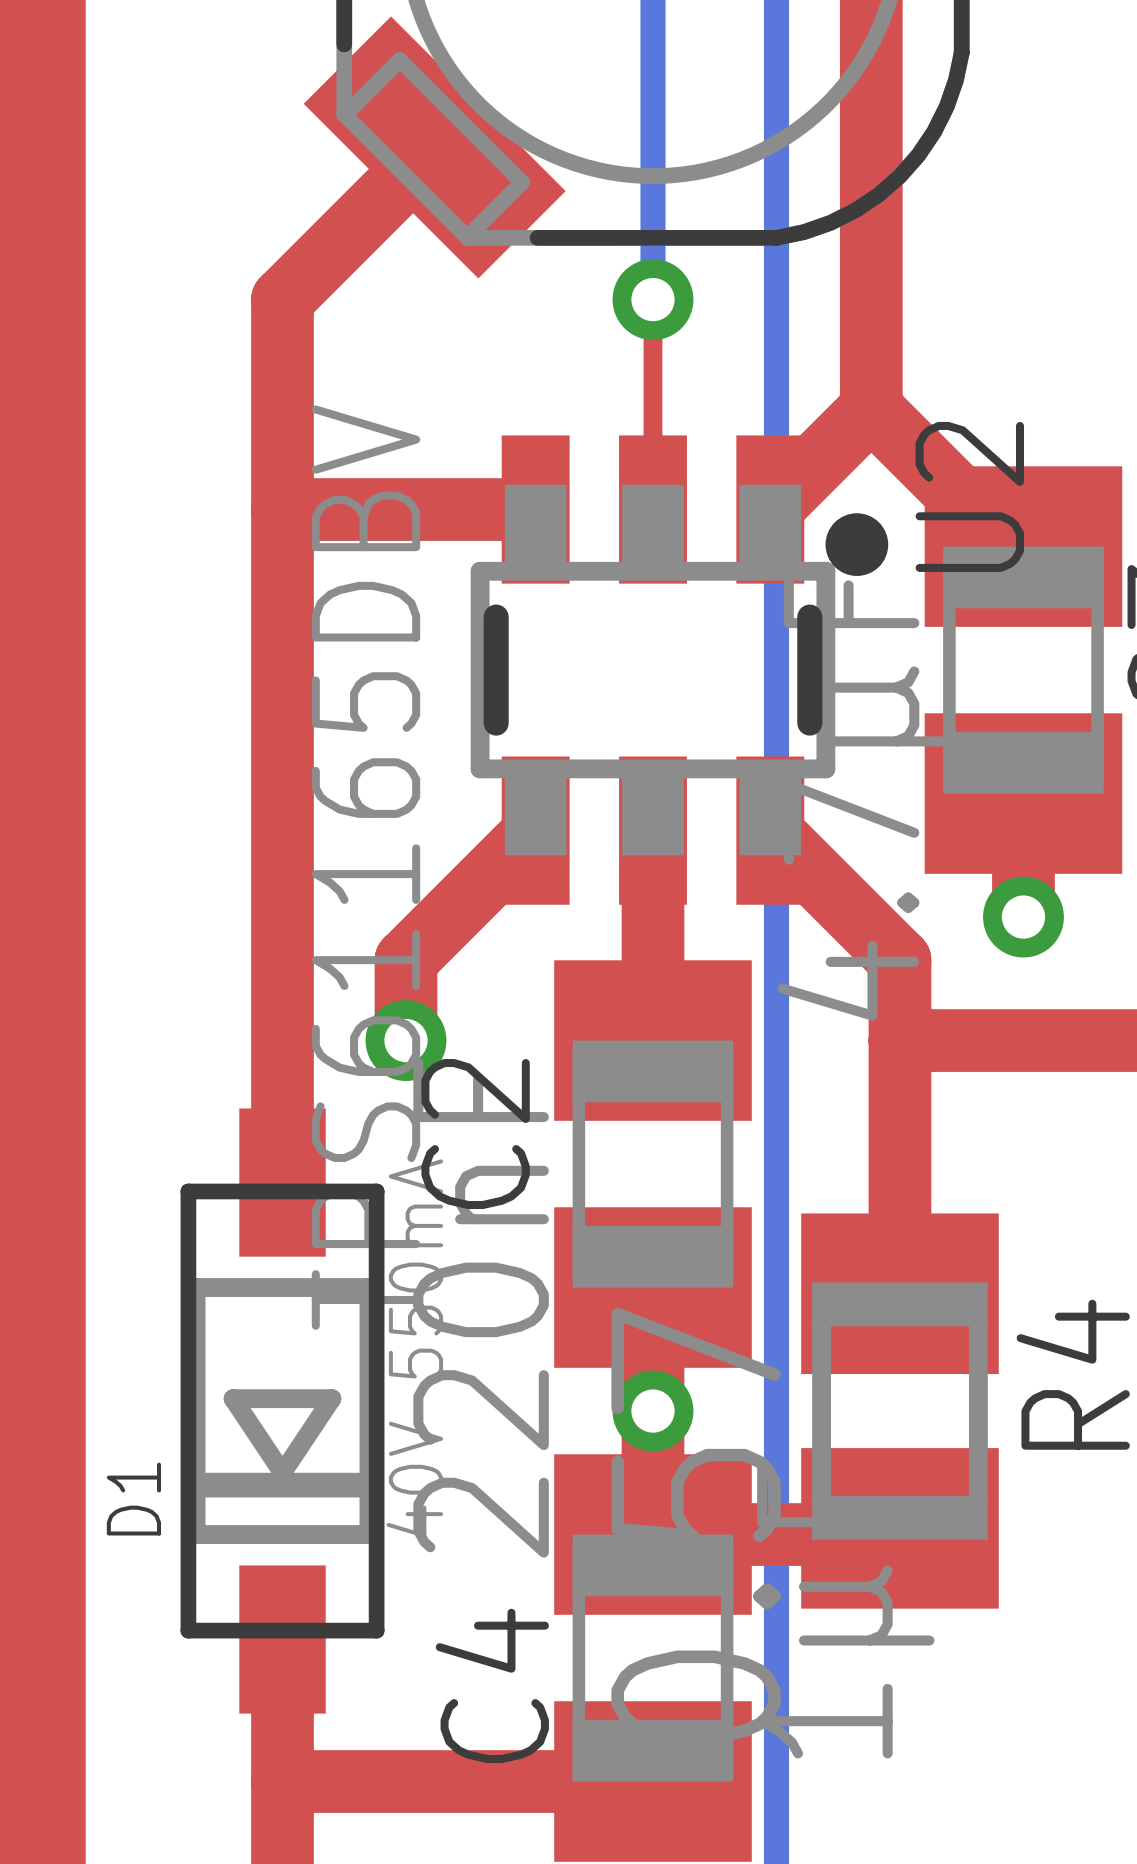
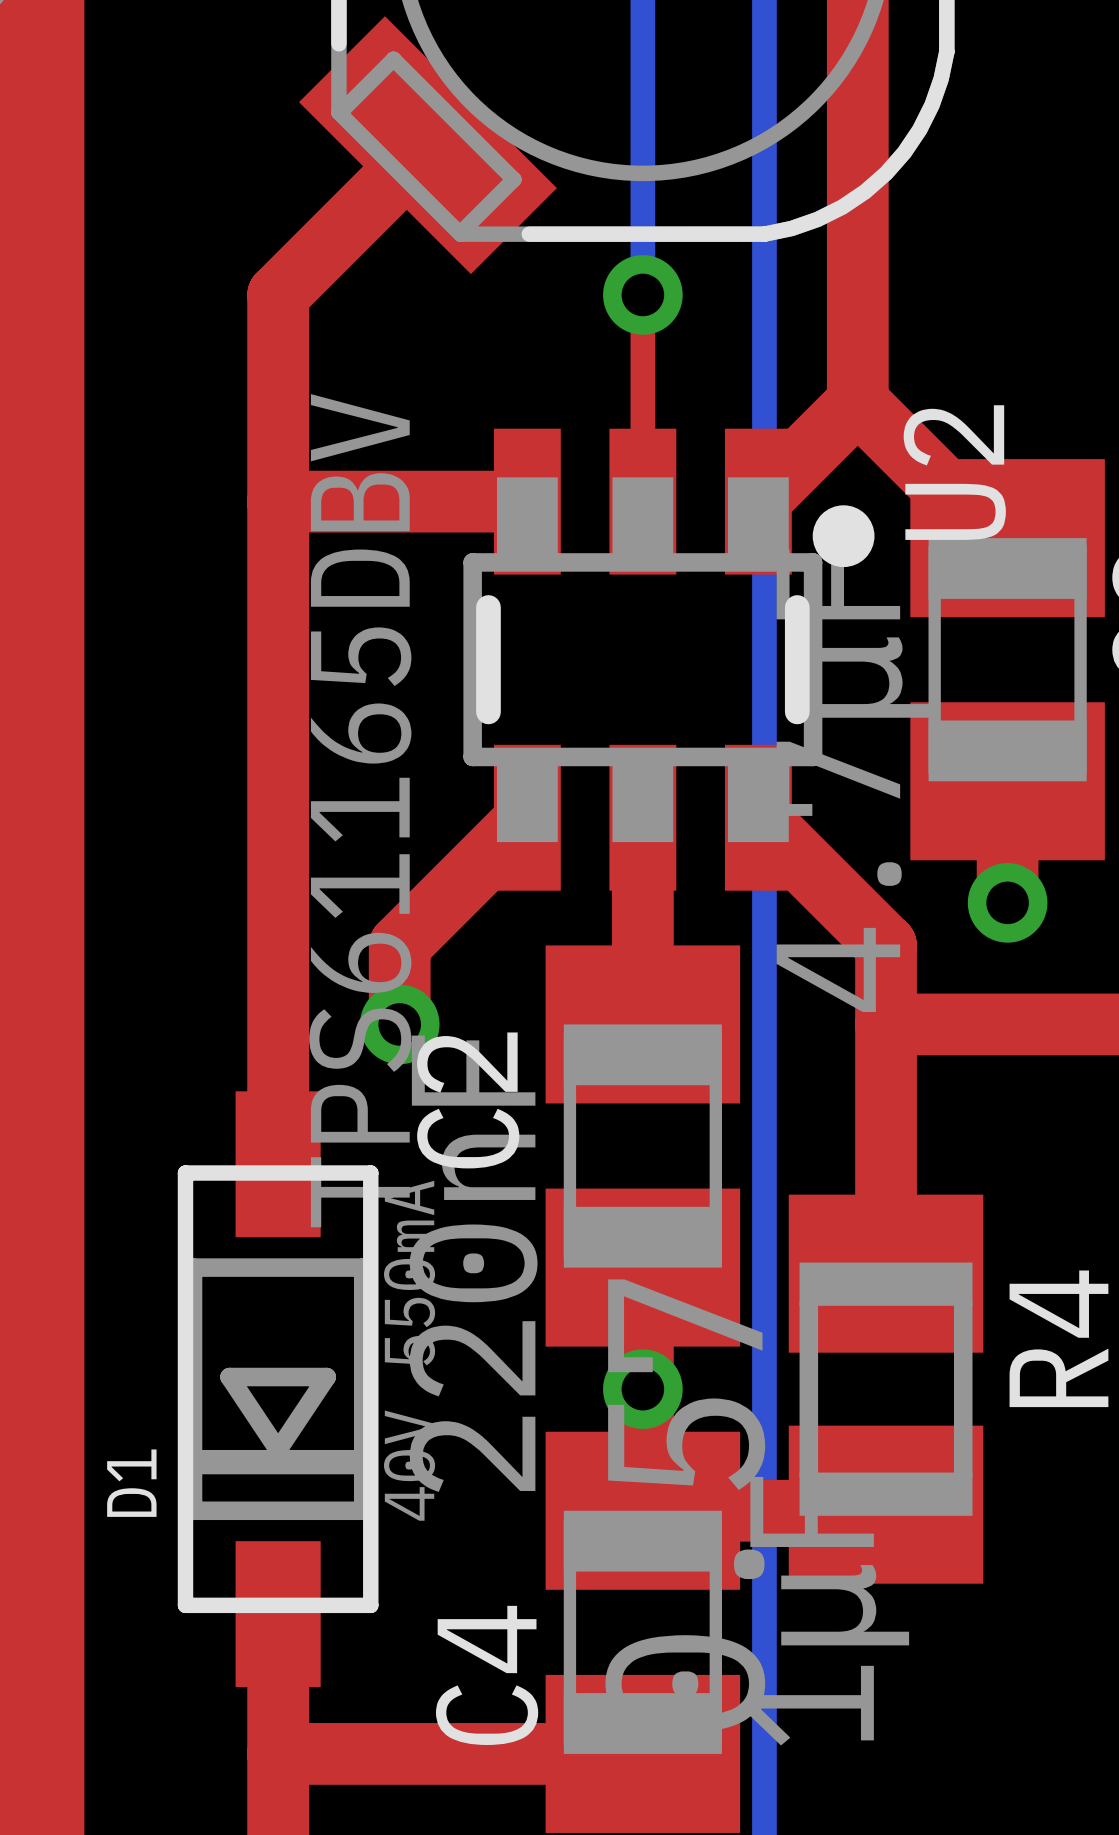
top track width: thin (652, 299) (652, 509) -> thick (642, 294) (642, 501)

